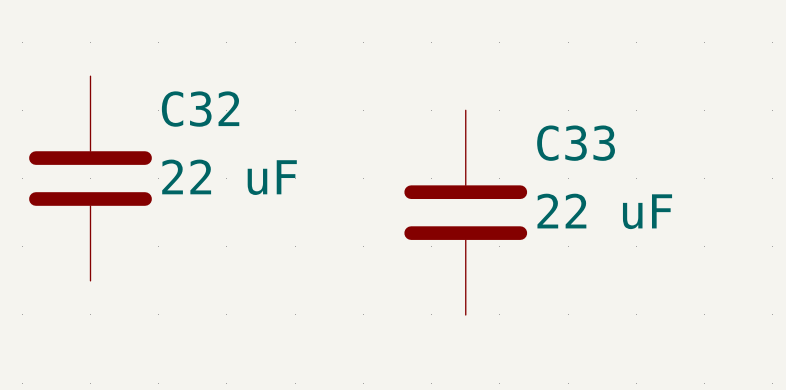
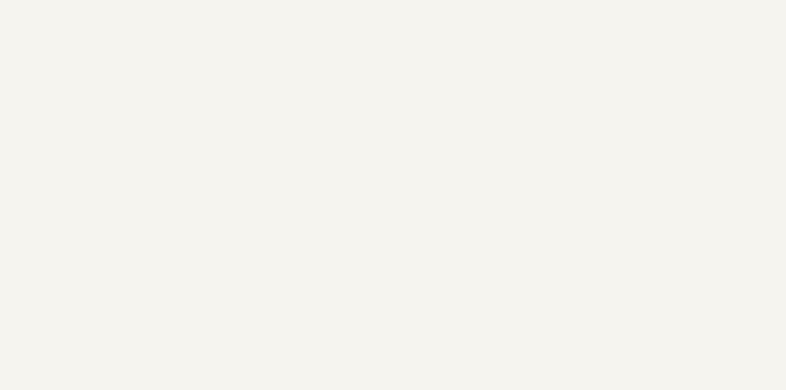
C32: 22 uF (90, 178) -> none
C33: 22 uF (465, 212) -> none

